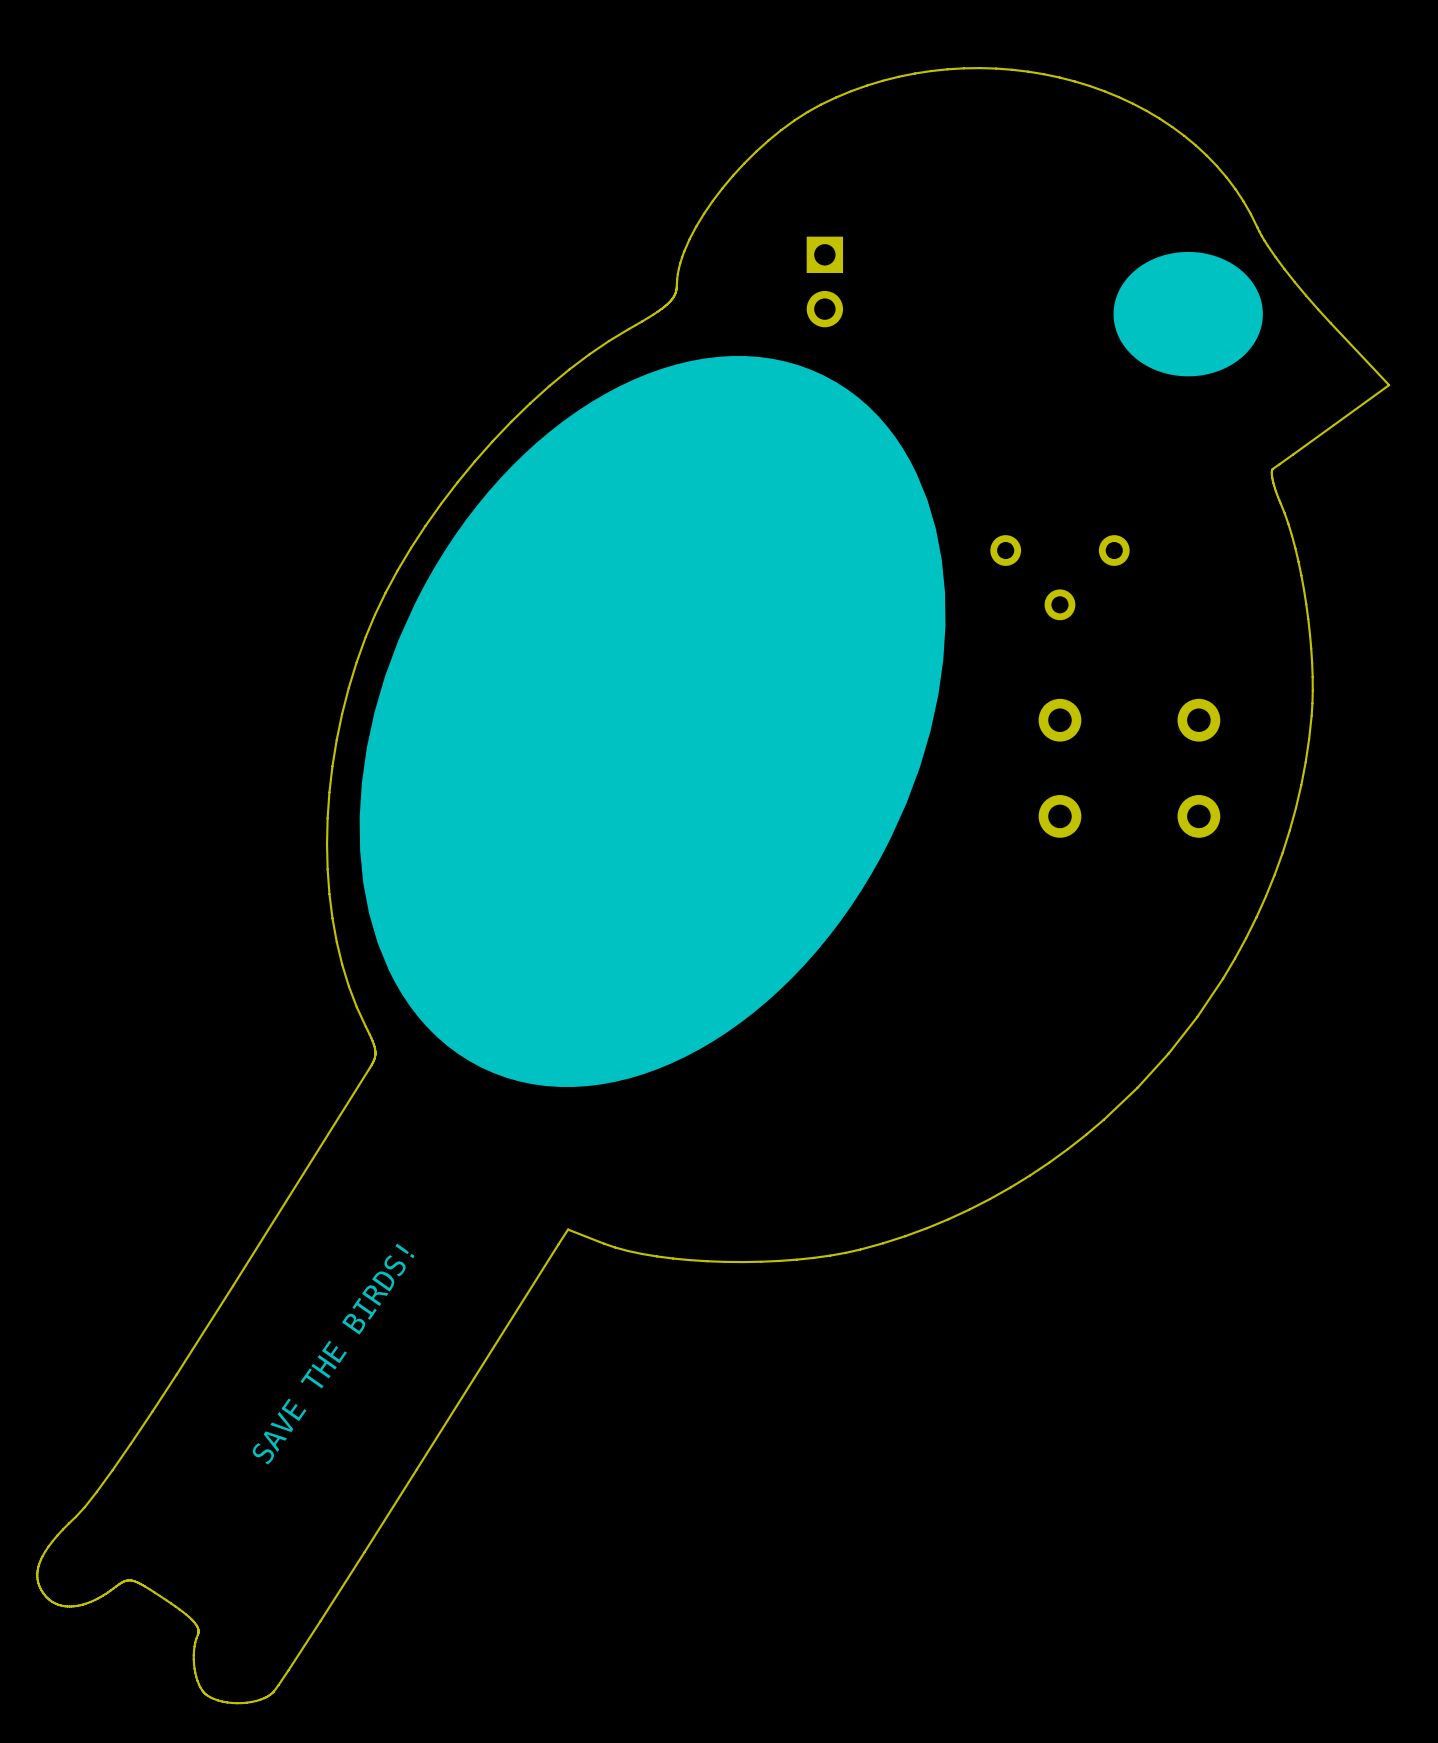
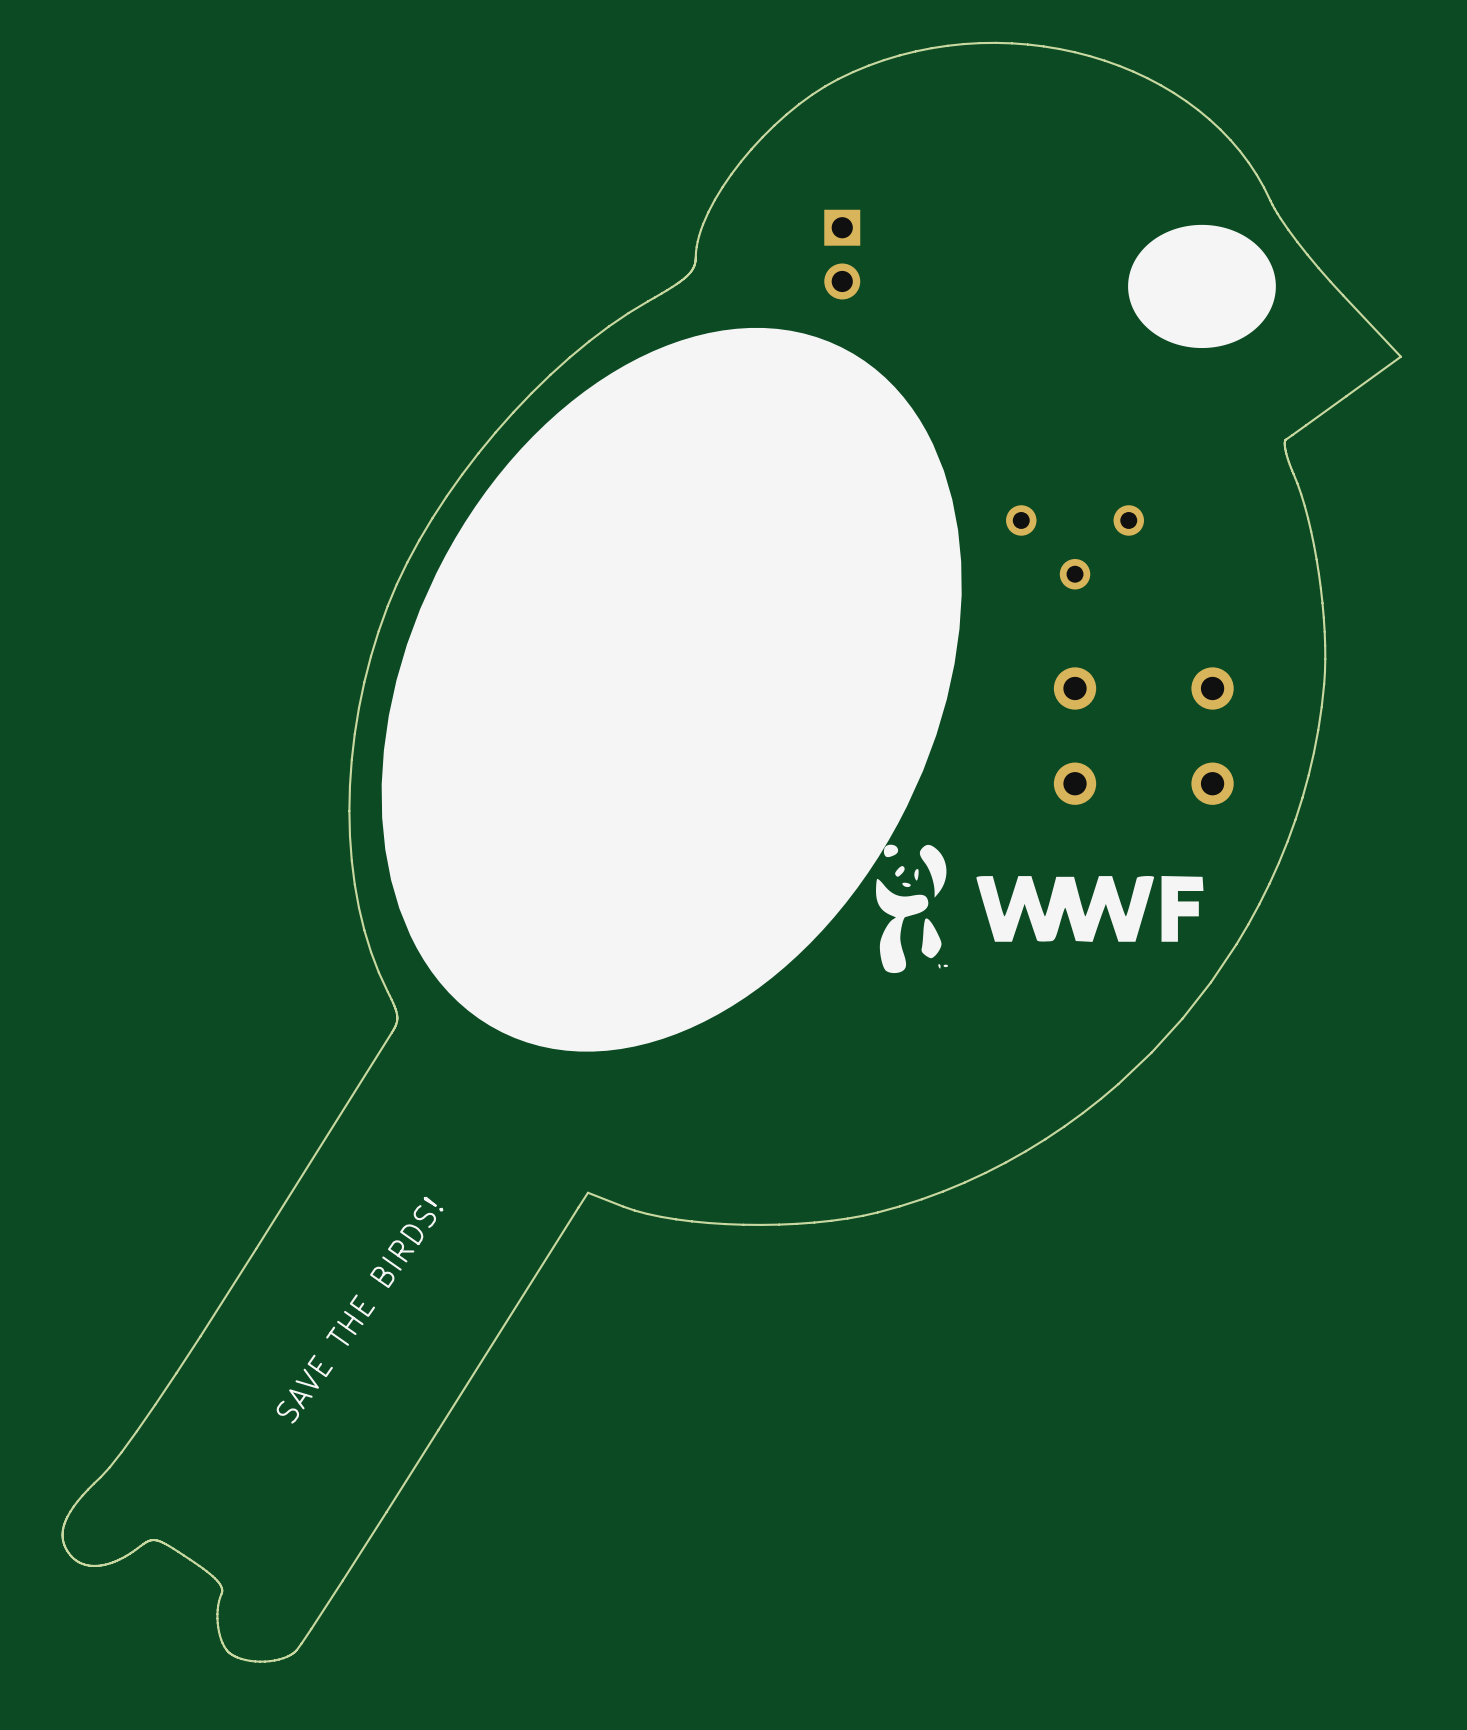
drawing: none -> [876, 844, 949, 974]
drawing: none -> [976, 875, 1204, 942]

